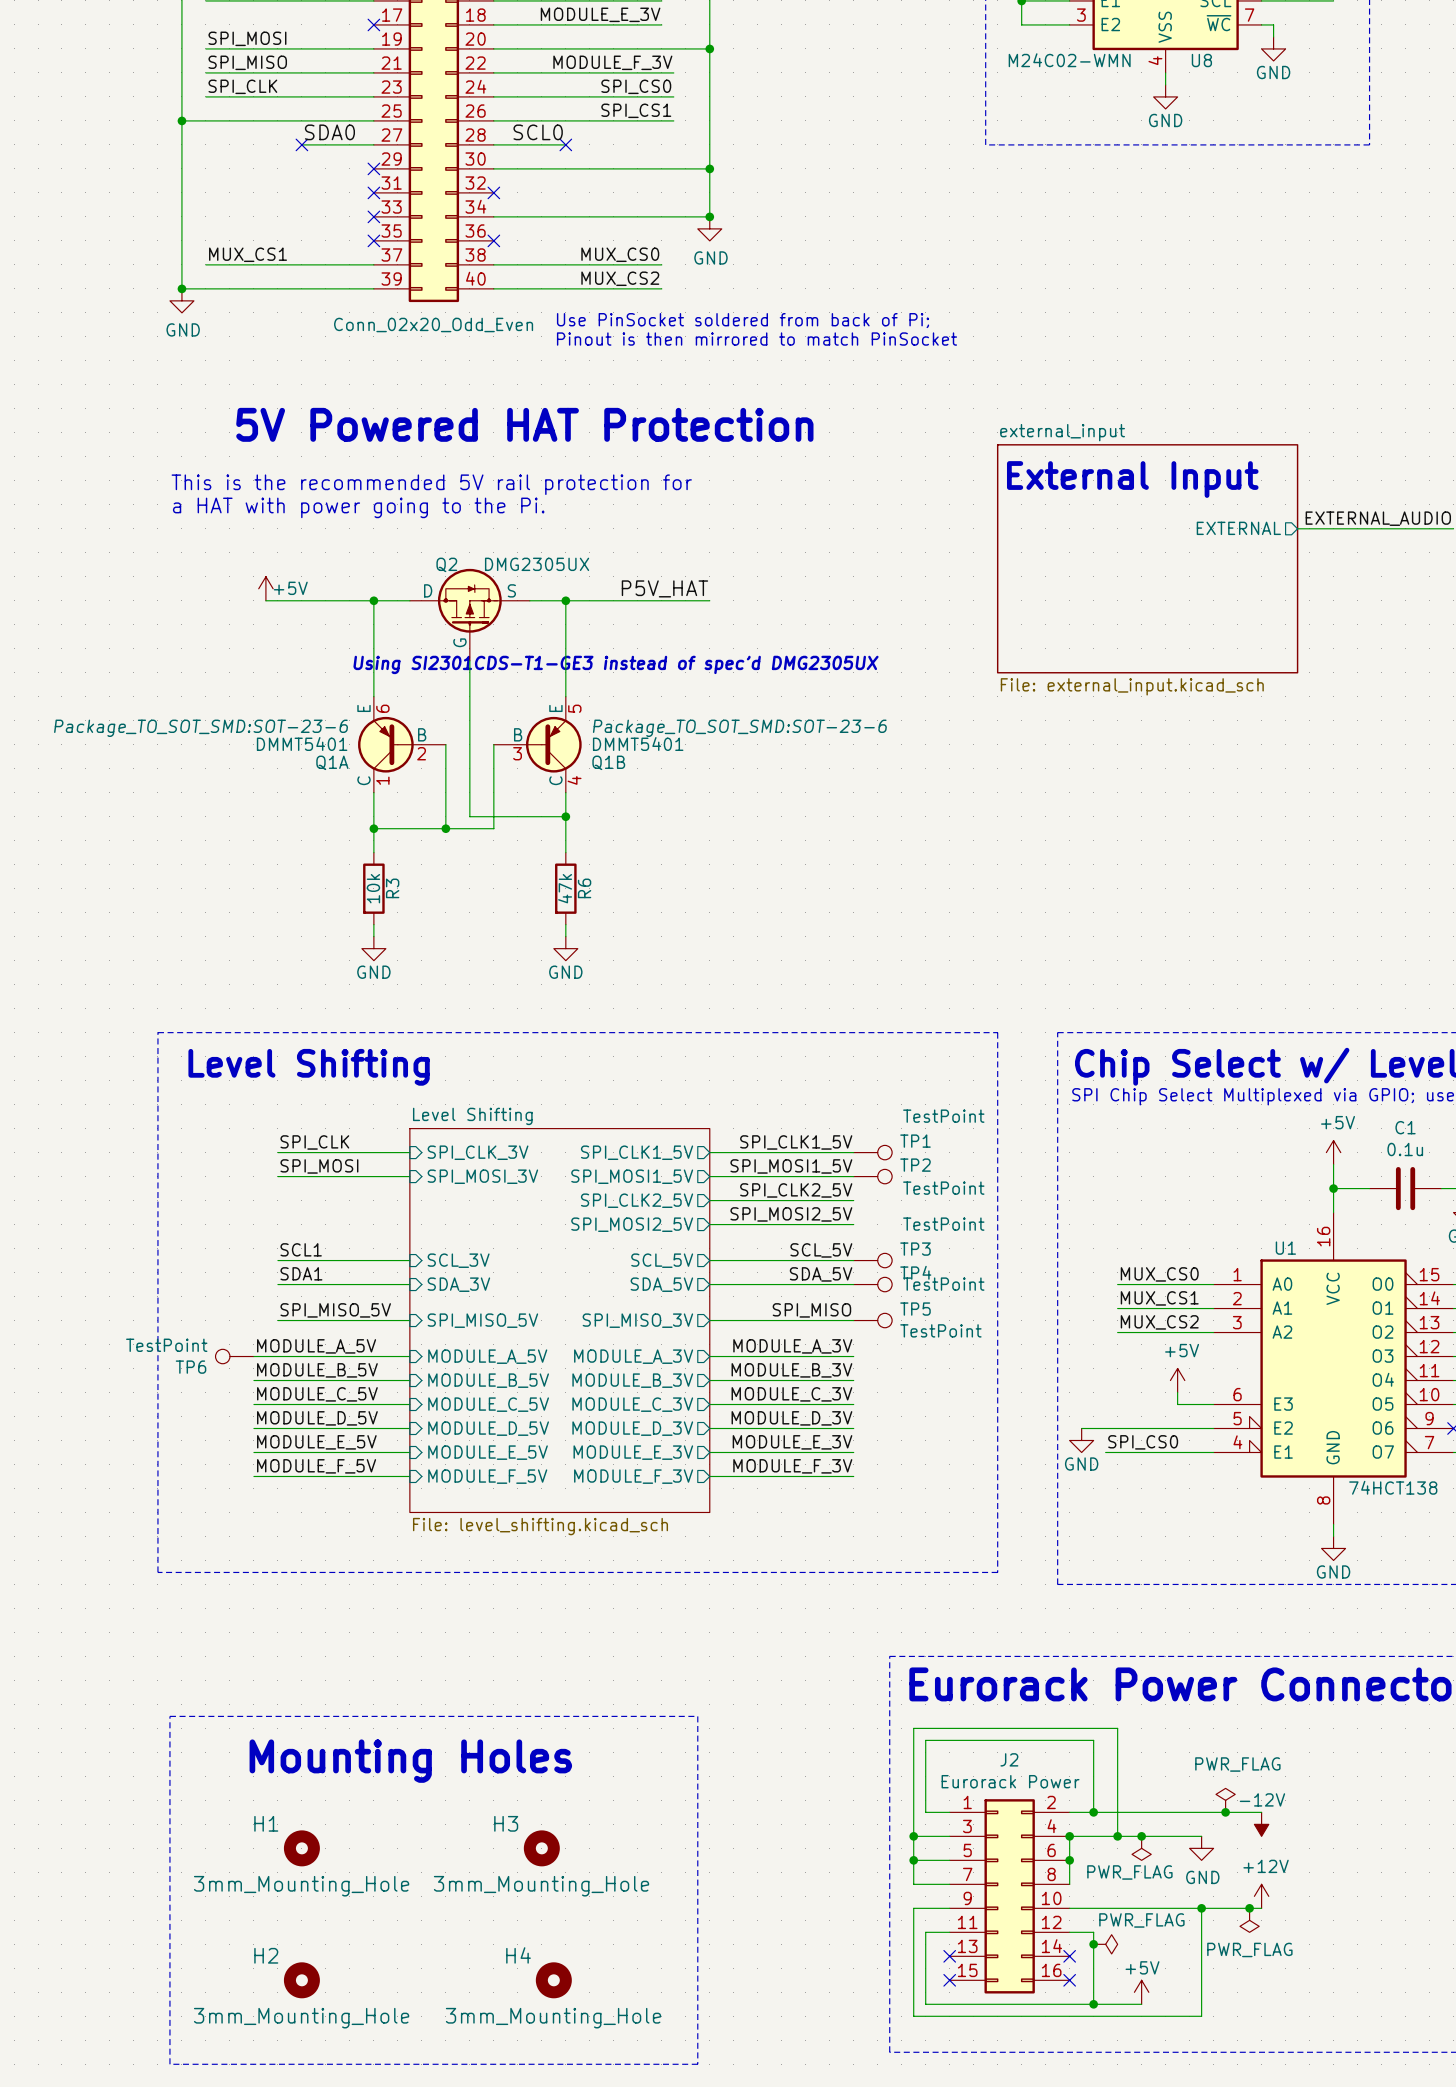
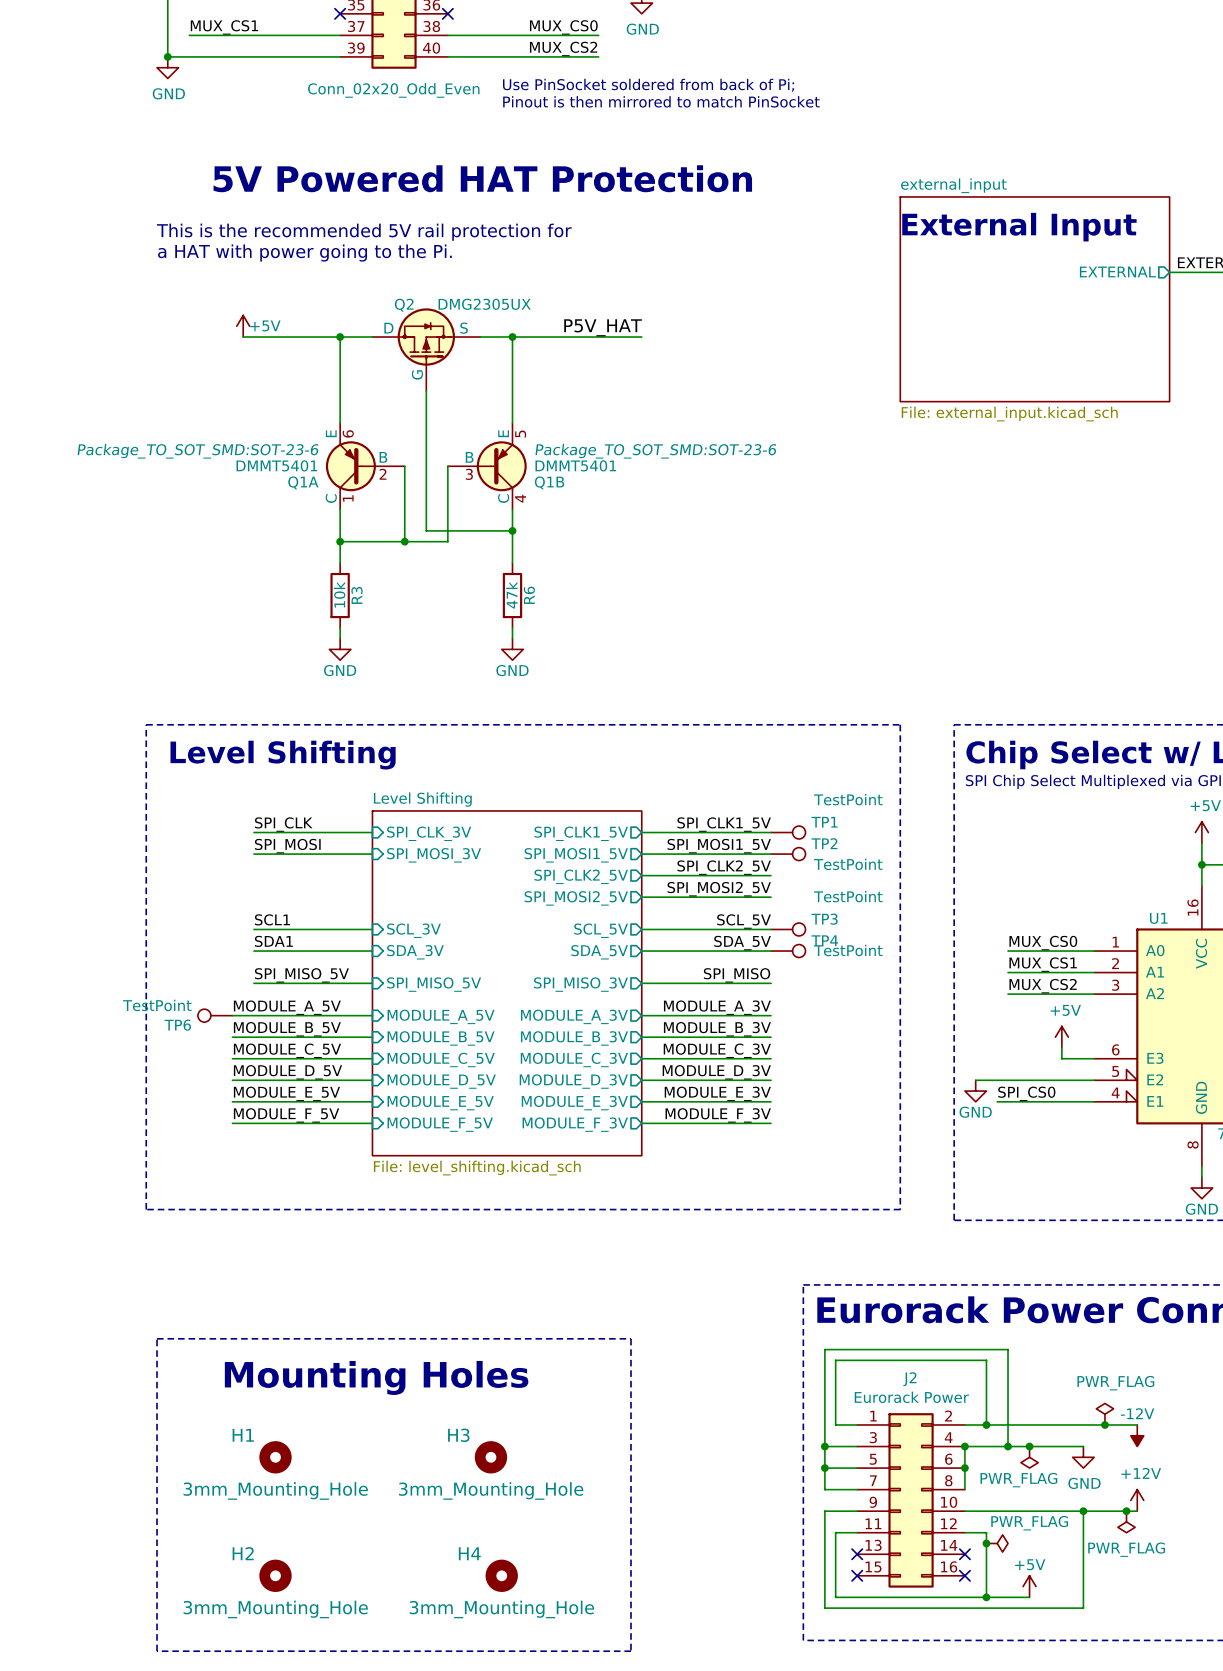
text: Using SI2301CDS-T1-GE3 instead of spec’d DMG2305UX (615, 664) -> none
TP5: TestPoint (872, 1320) -> none

